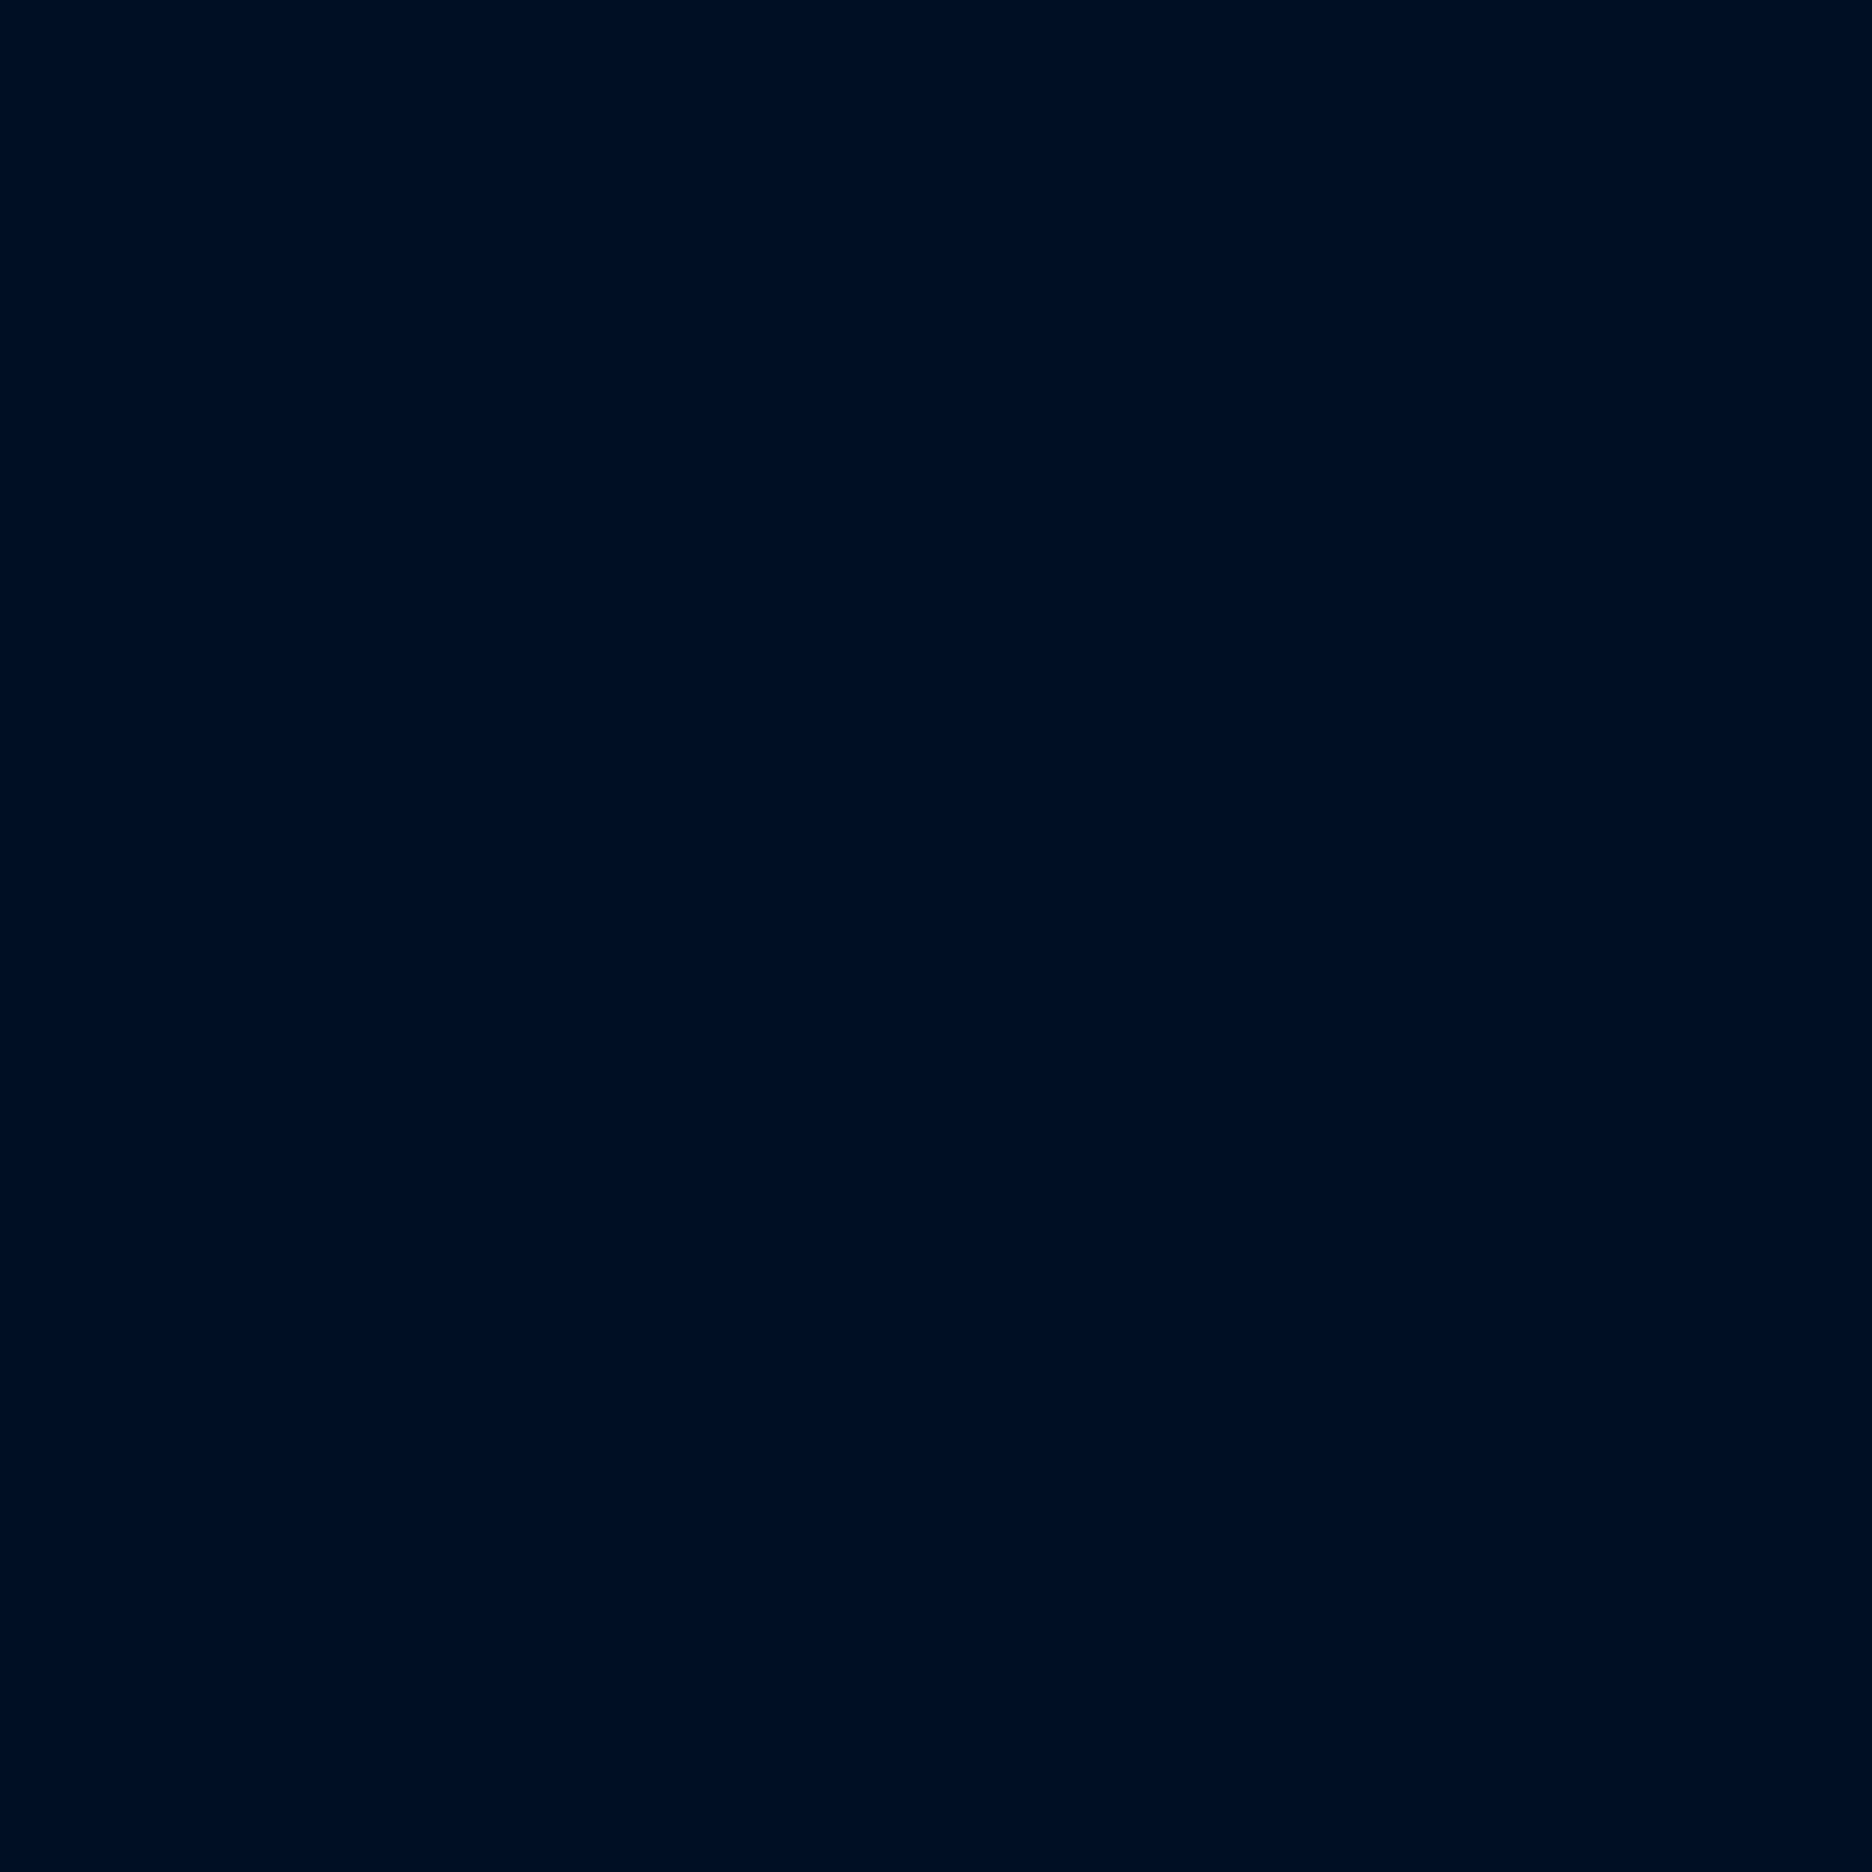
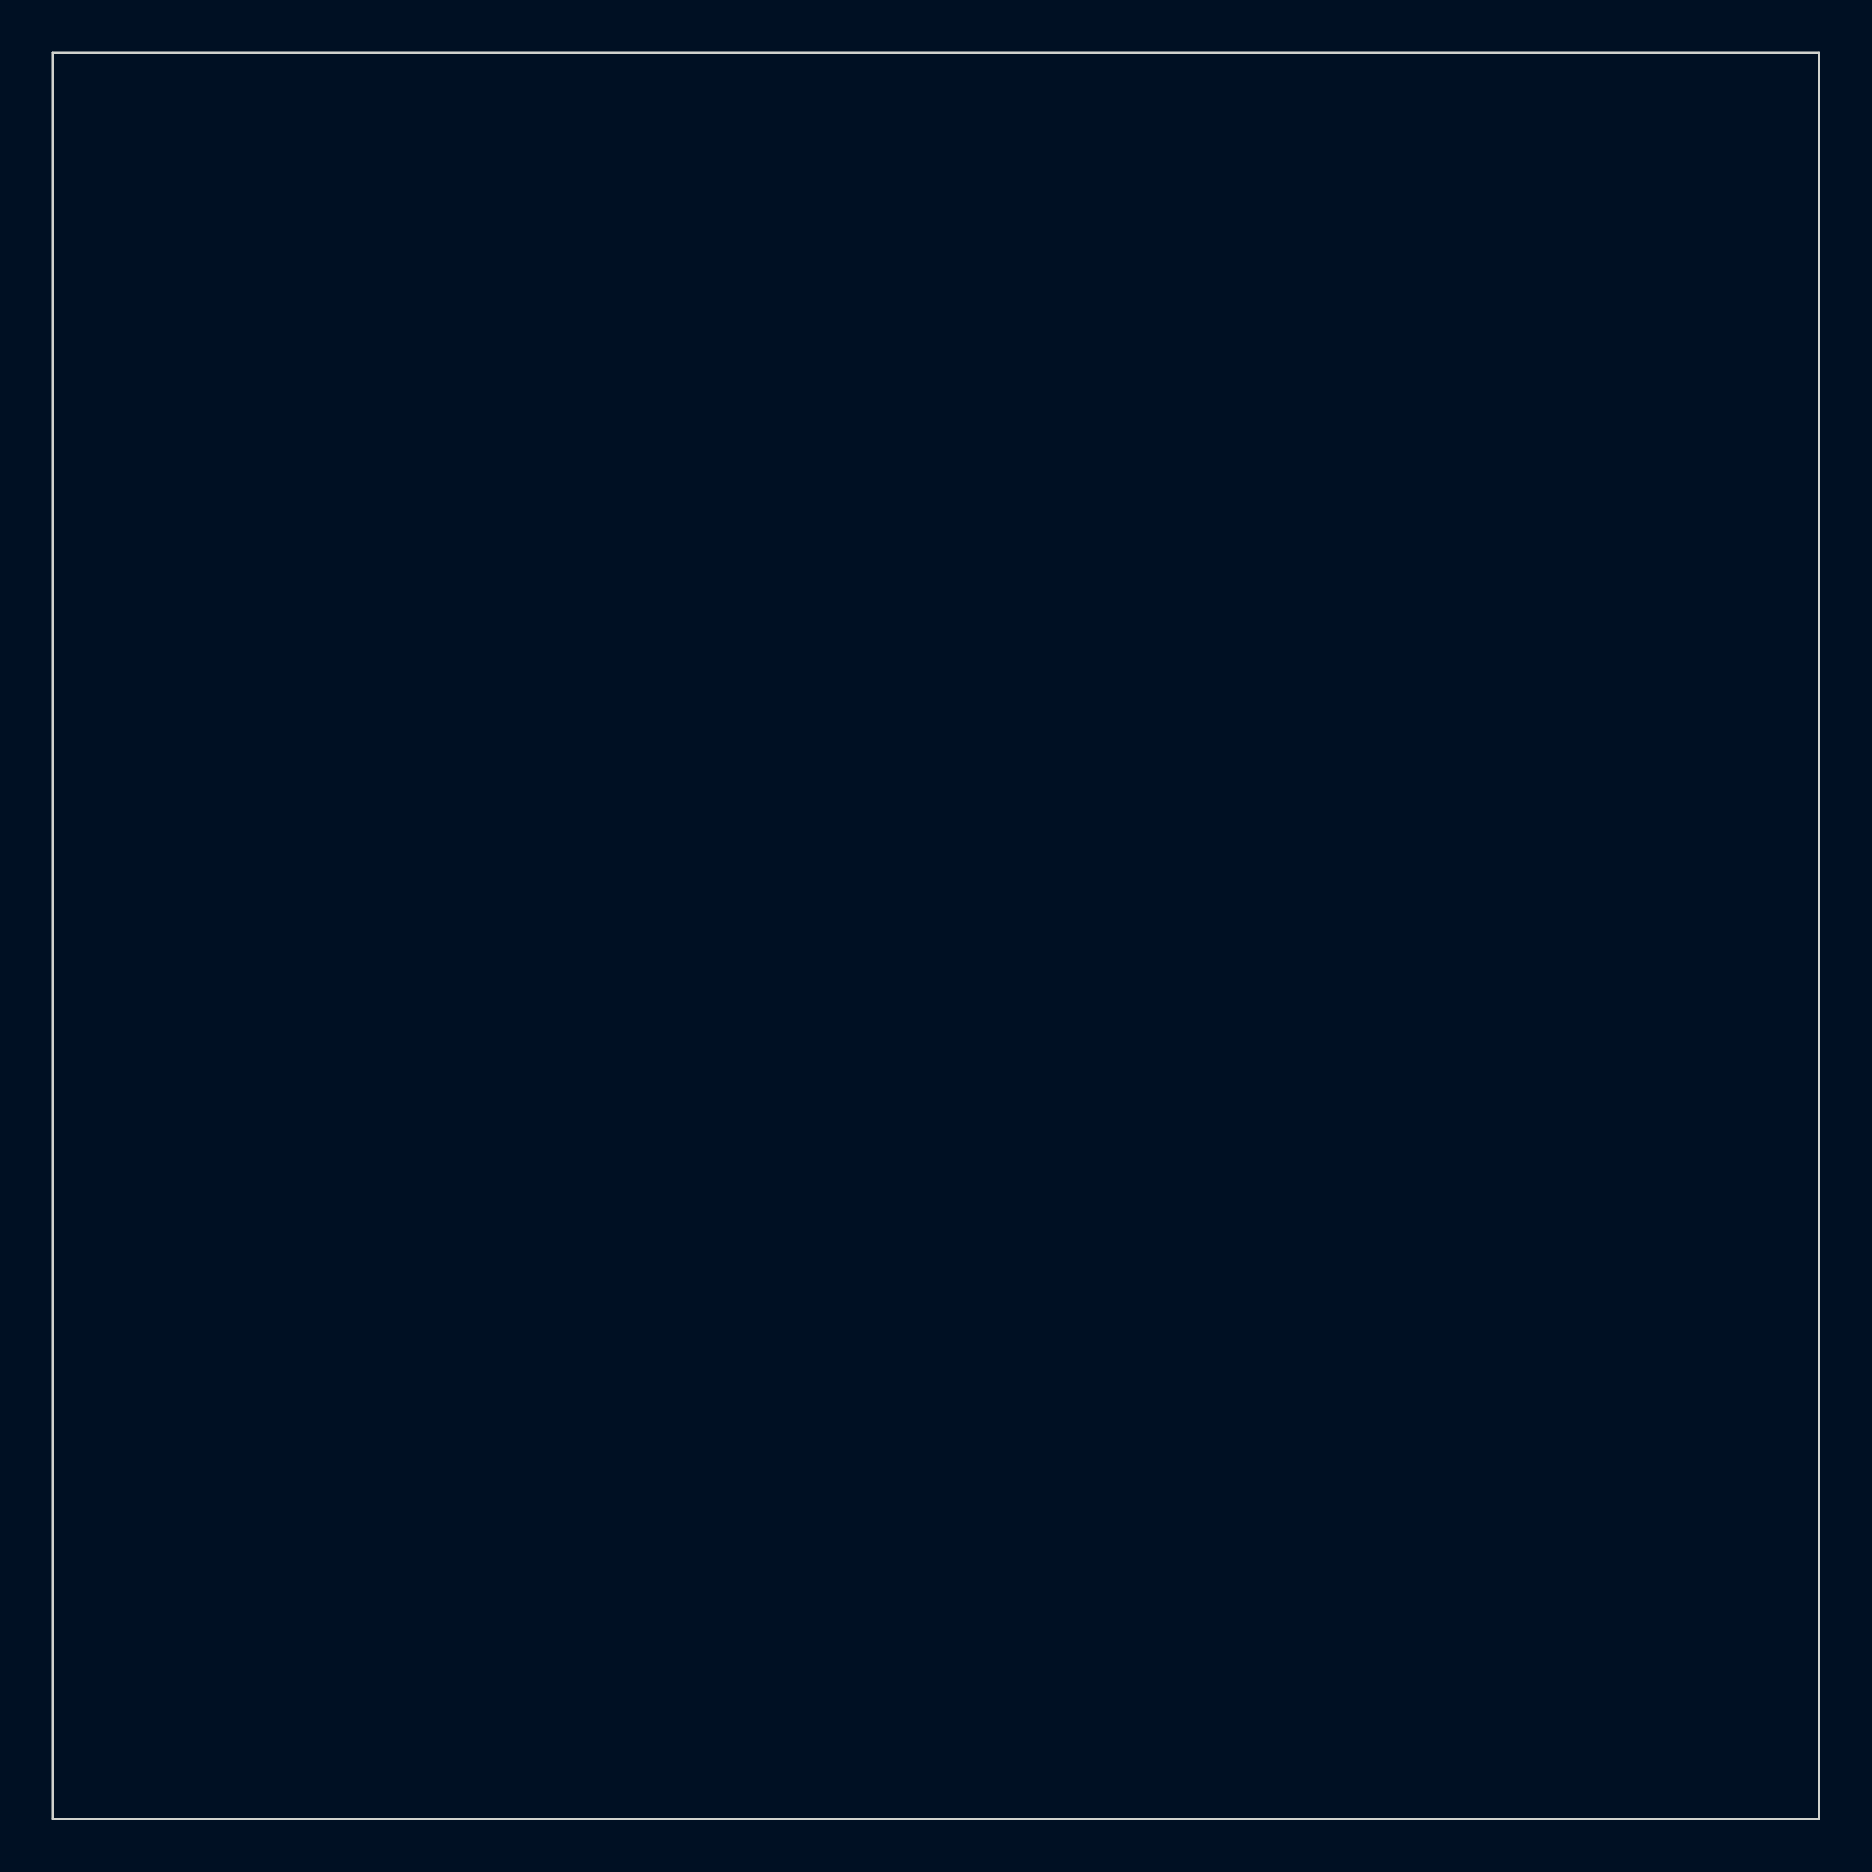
board edge: none -> (52, 52) (1819, 52) (1819, 1819) (52, 1819) (52, 52)

